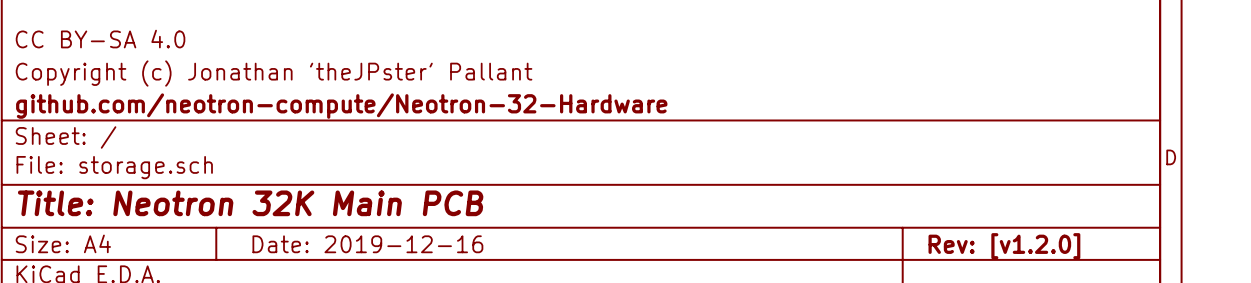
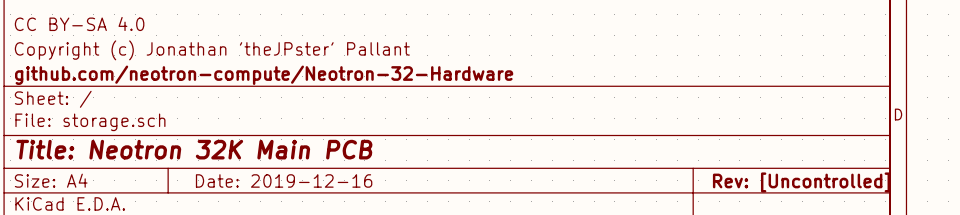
title block: Rev: [v1.2.0] (1004, 246) -> Rev: [Uncontrolled] (801, 182)

